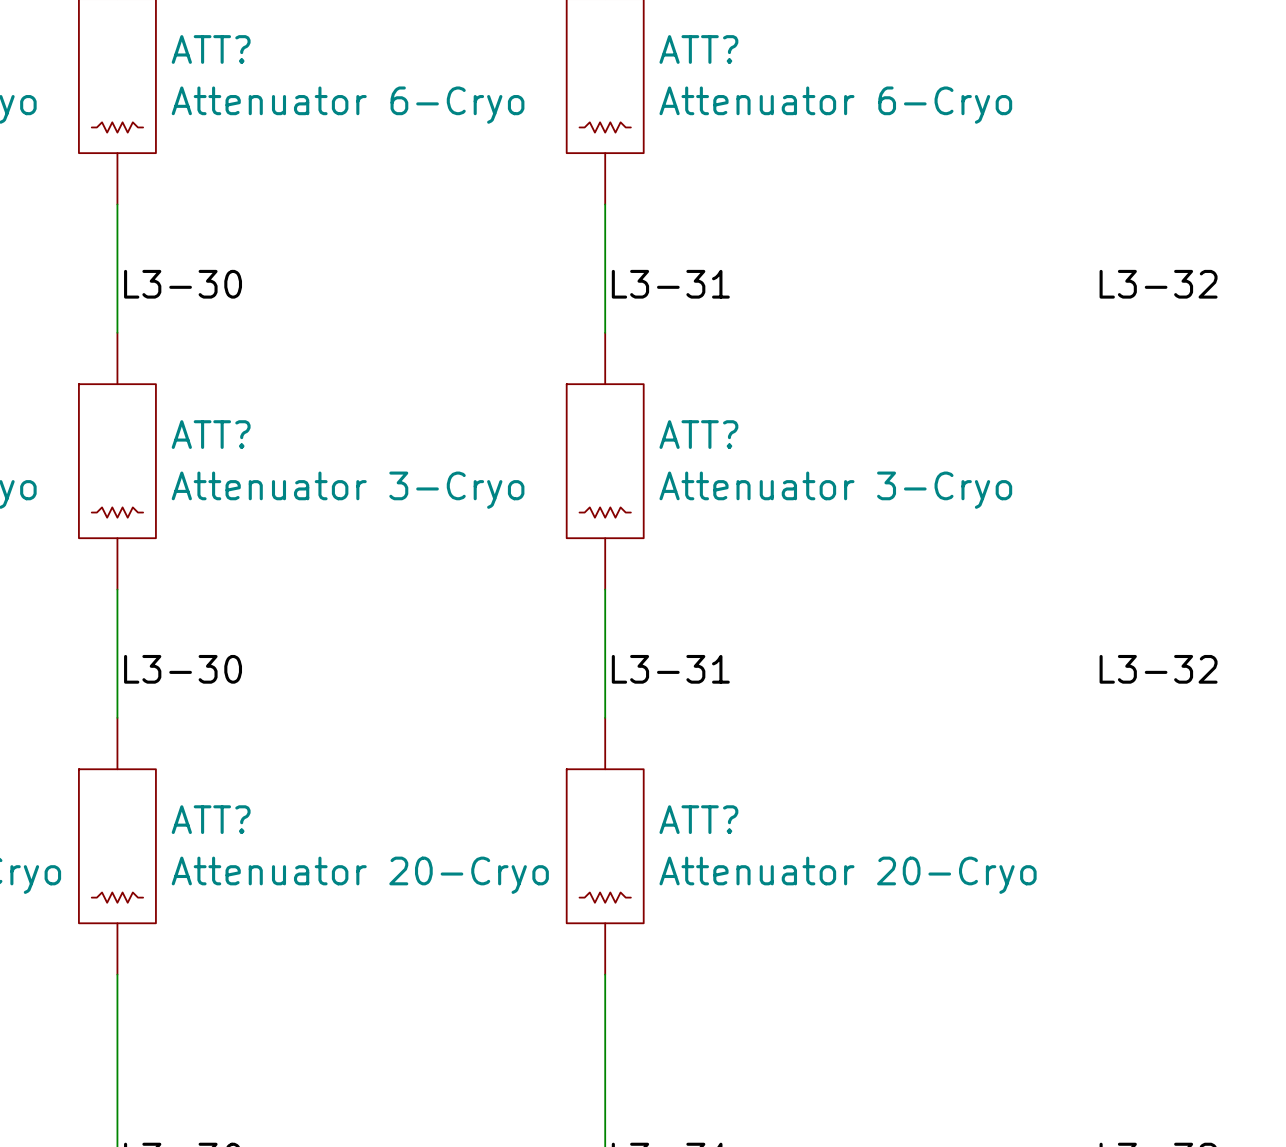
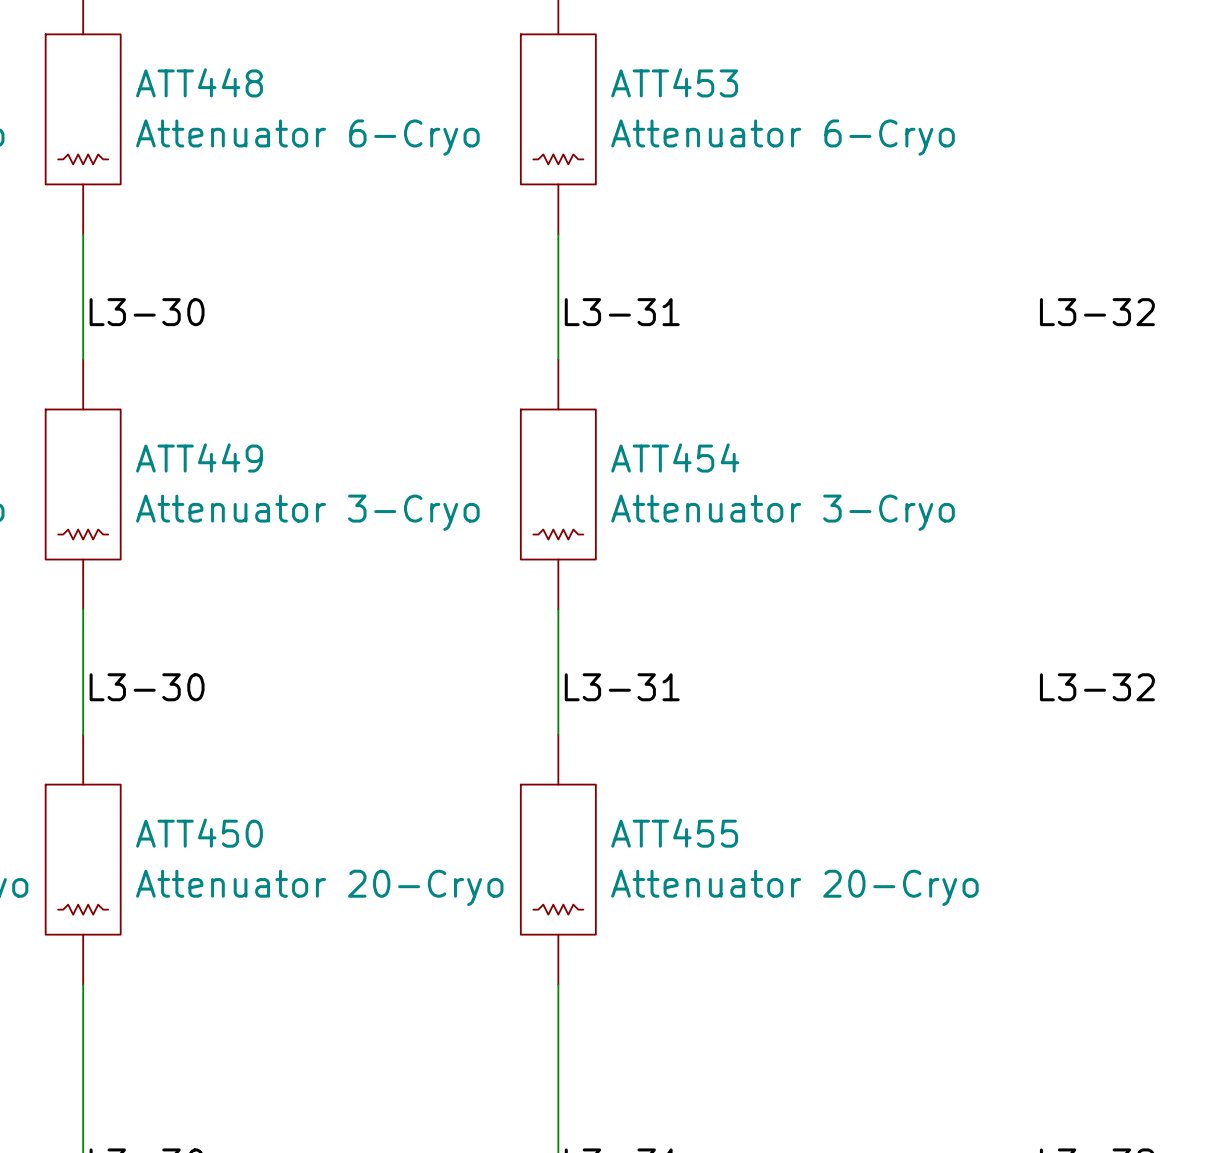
ATT? name: ATT? (211, 49) -> ATT448 (199, 82)
ATT? name: ATT? (698, 49) -> ATT453 (674, 82)
ATT? name: ATT? (211, 434) -> ATT449 (199, 457)
ATT? name: ATT? (698, 434) -> ATT454 (675, 457)
ATT? name: ATT? (211, 819) -> ATT450 (199, 833)
ATT? name: ATT? (698, 819) -> ATT455 (674, 833)

